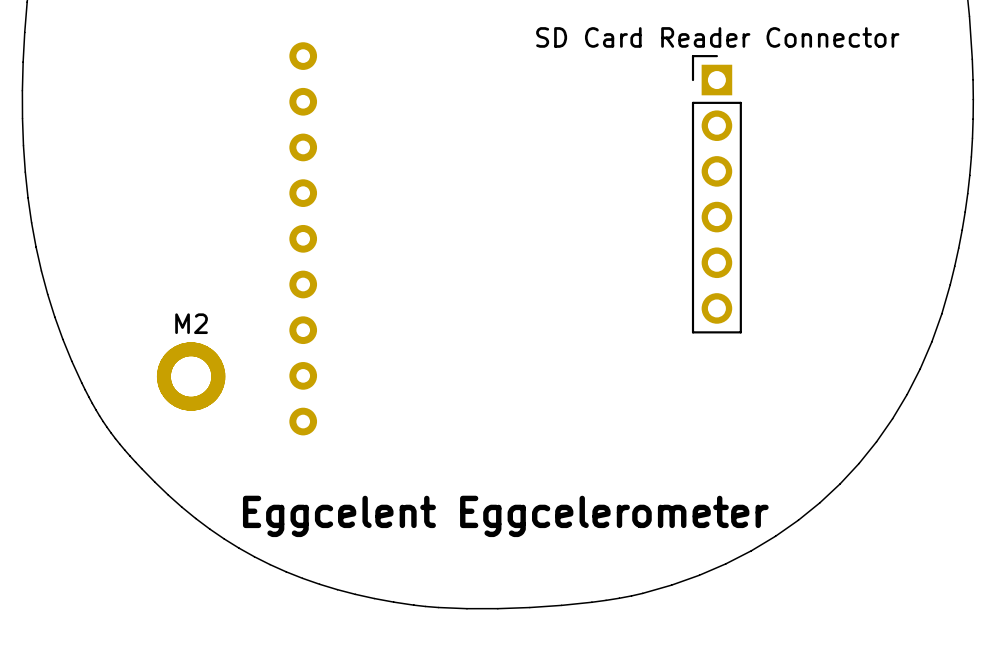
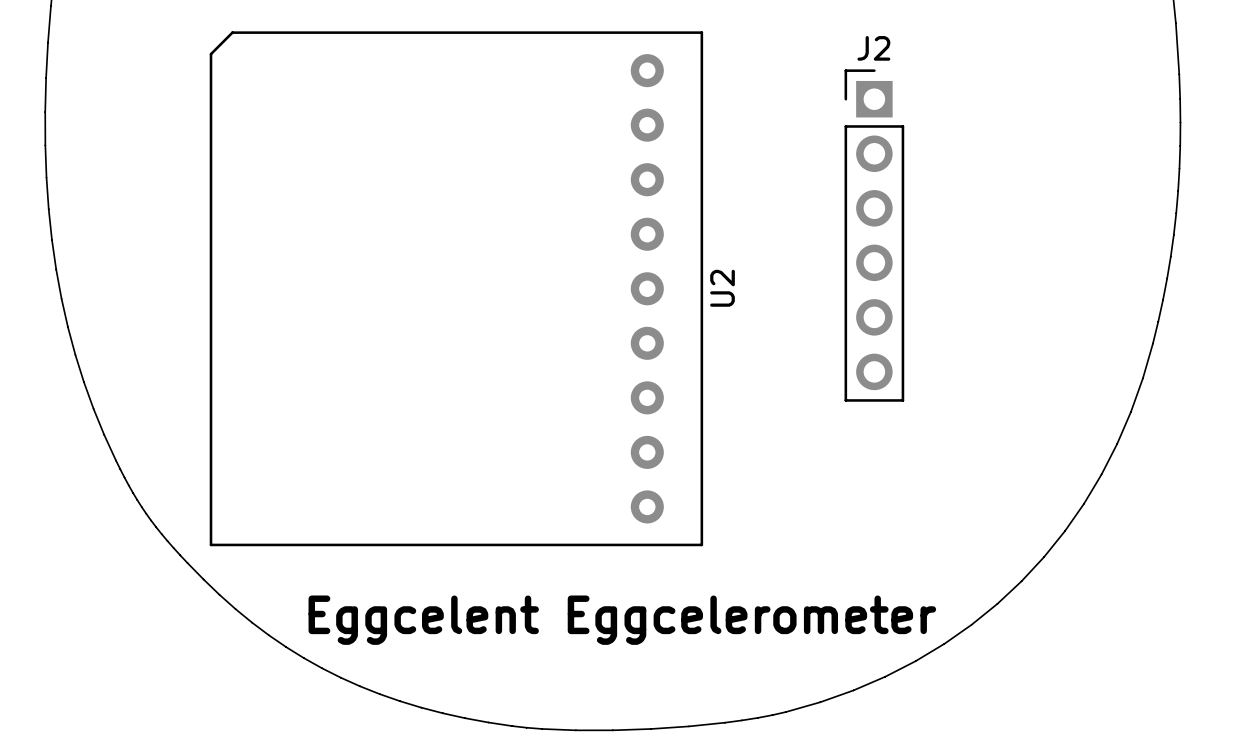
SD Card Reader Connector name: SD Card Reader Connector (717, 37) -> J2 (873, 48)
U2 side: bottom (303, 238) -> top (456, 288)
M2: (191, 376) -> none
part: (191, 376) -> none

